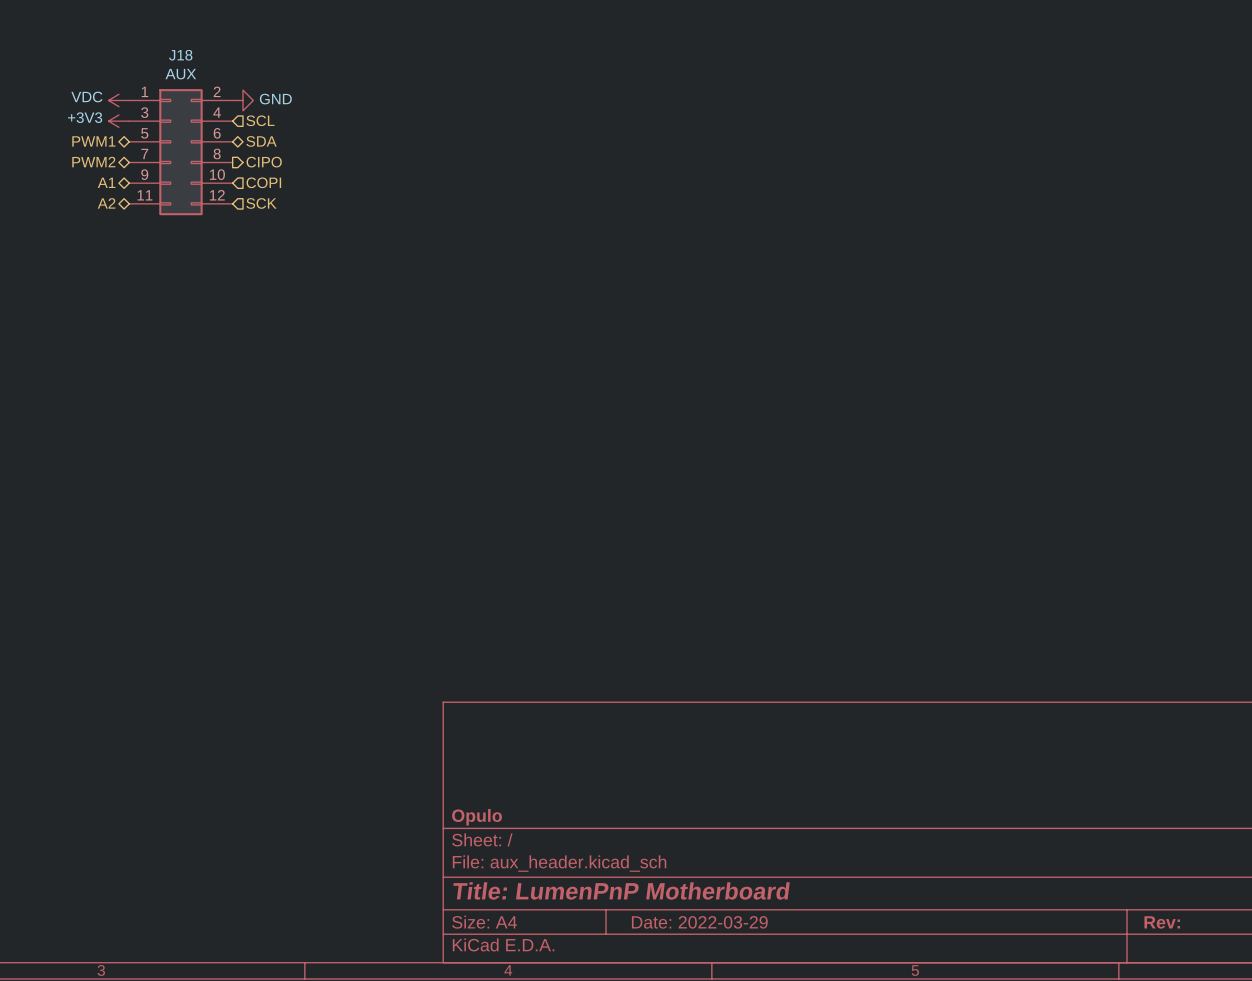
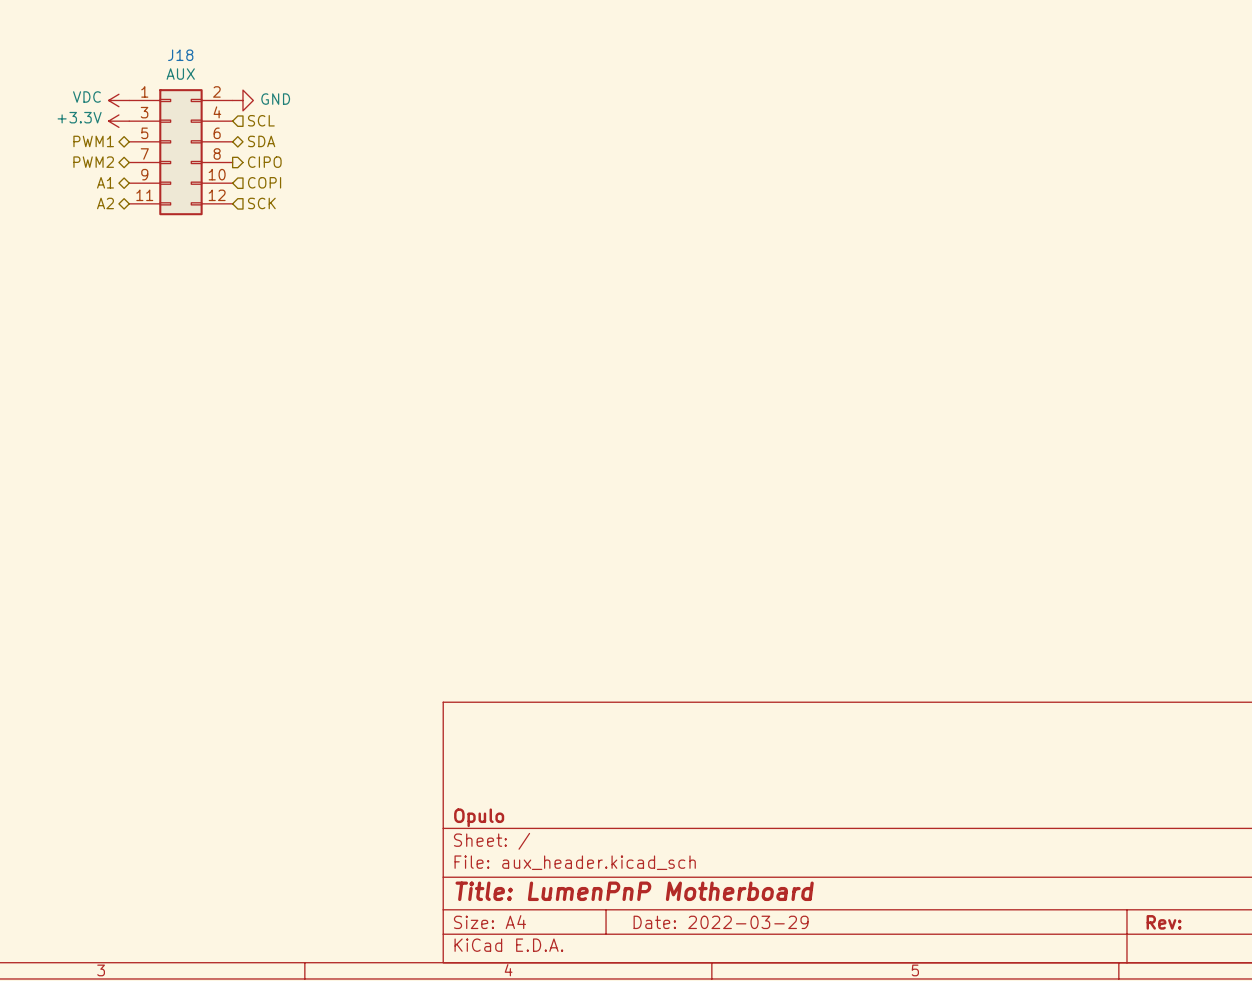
power symbol: +3V3 (118, 121) -> +3.3V (118, 121)

